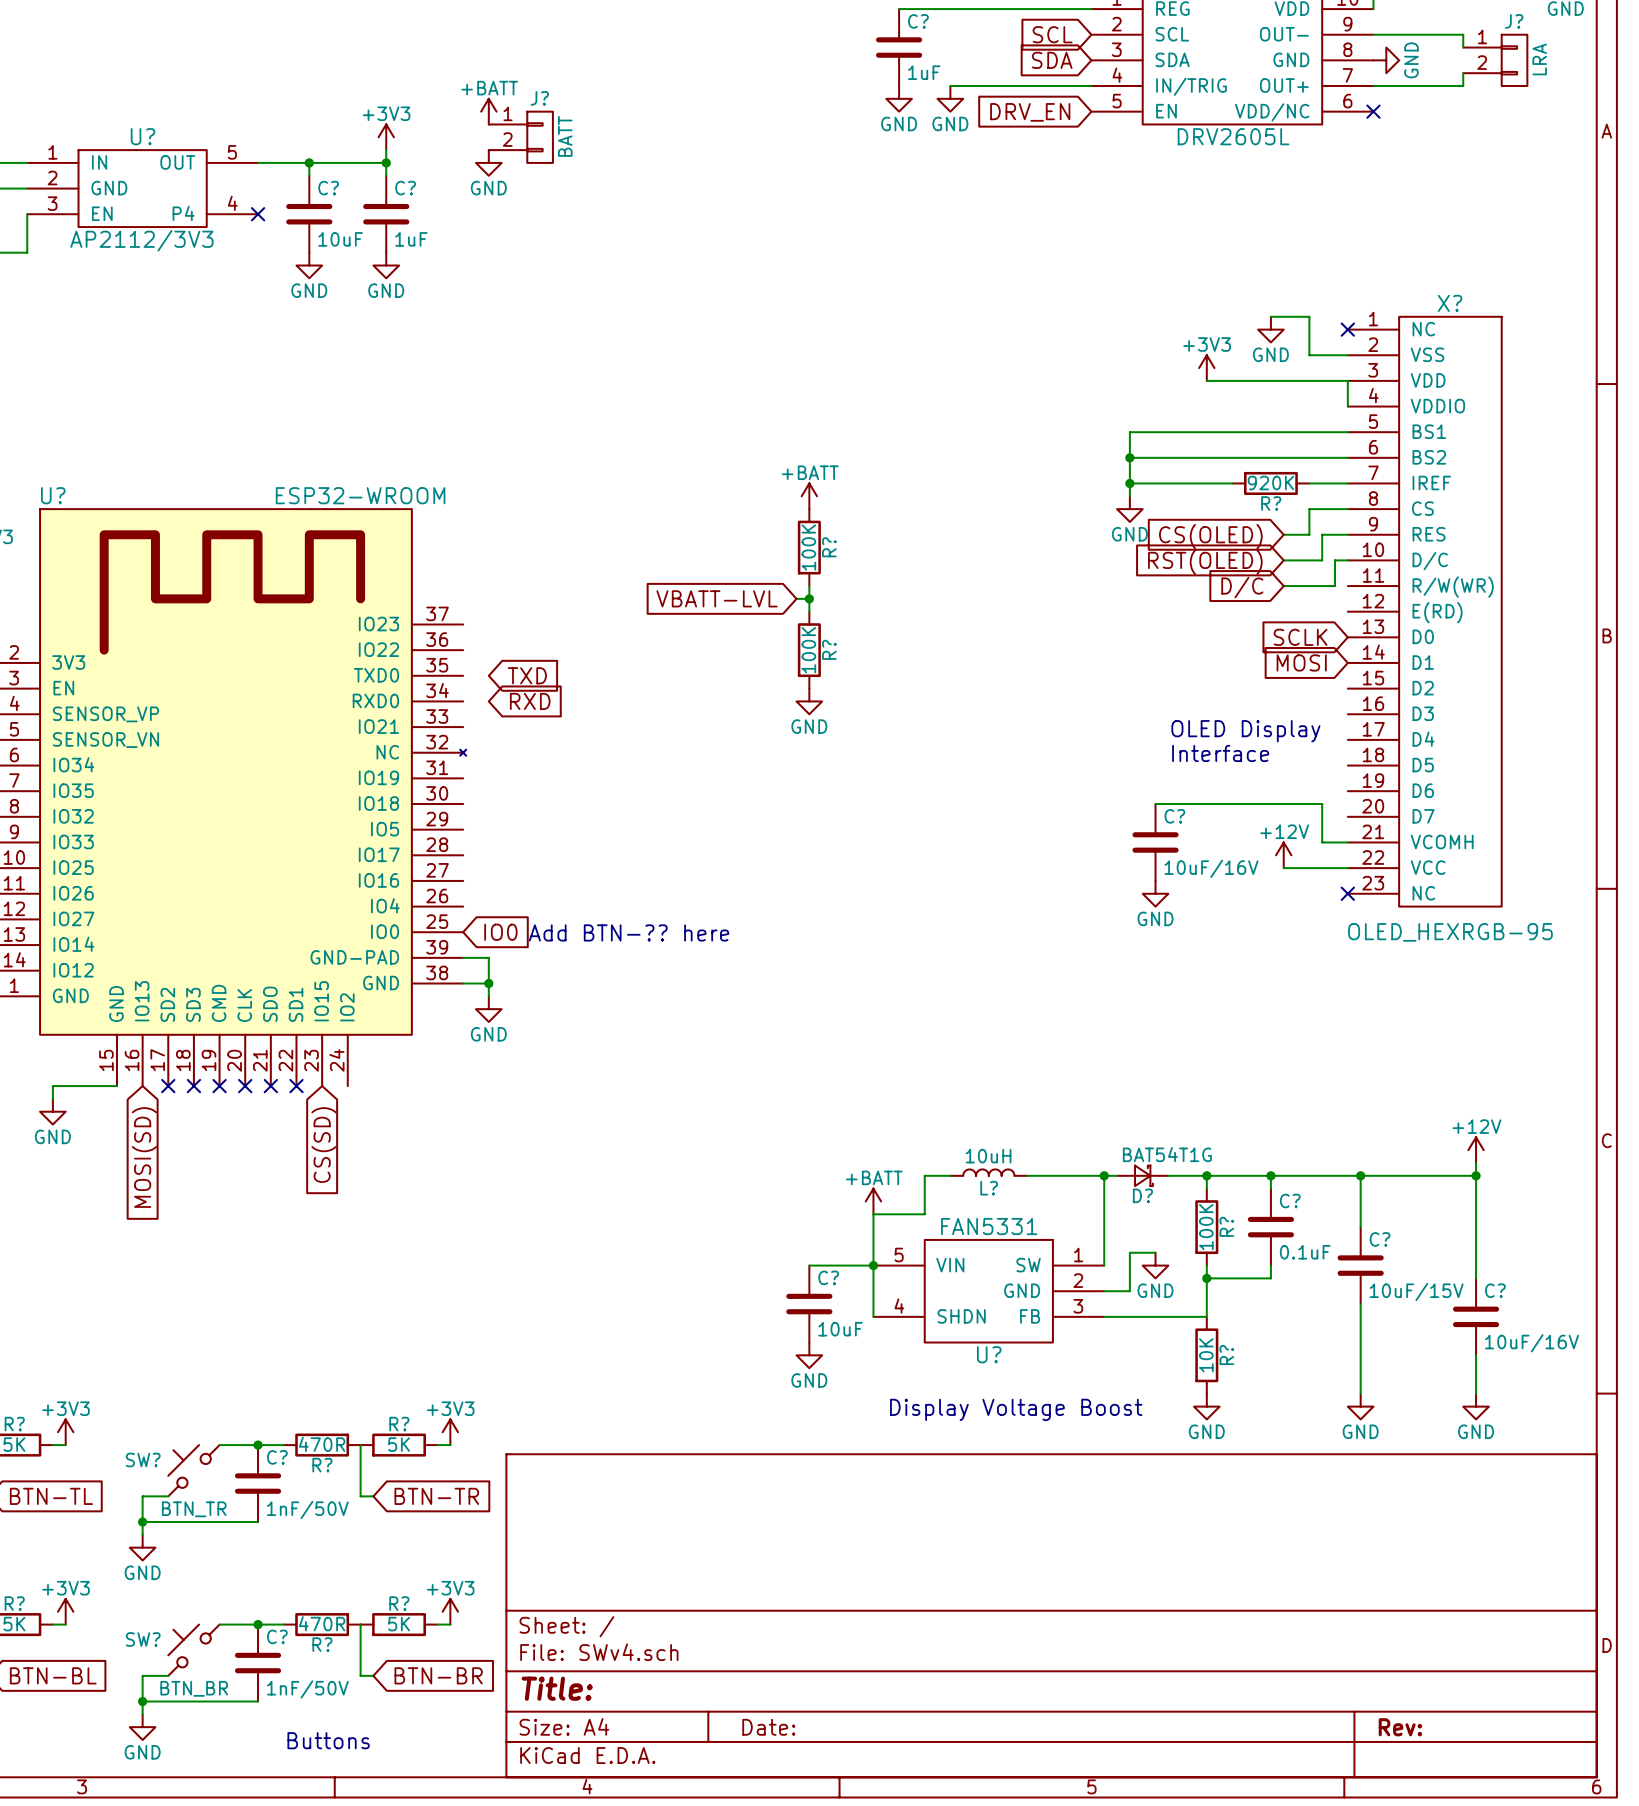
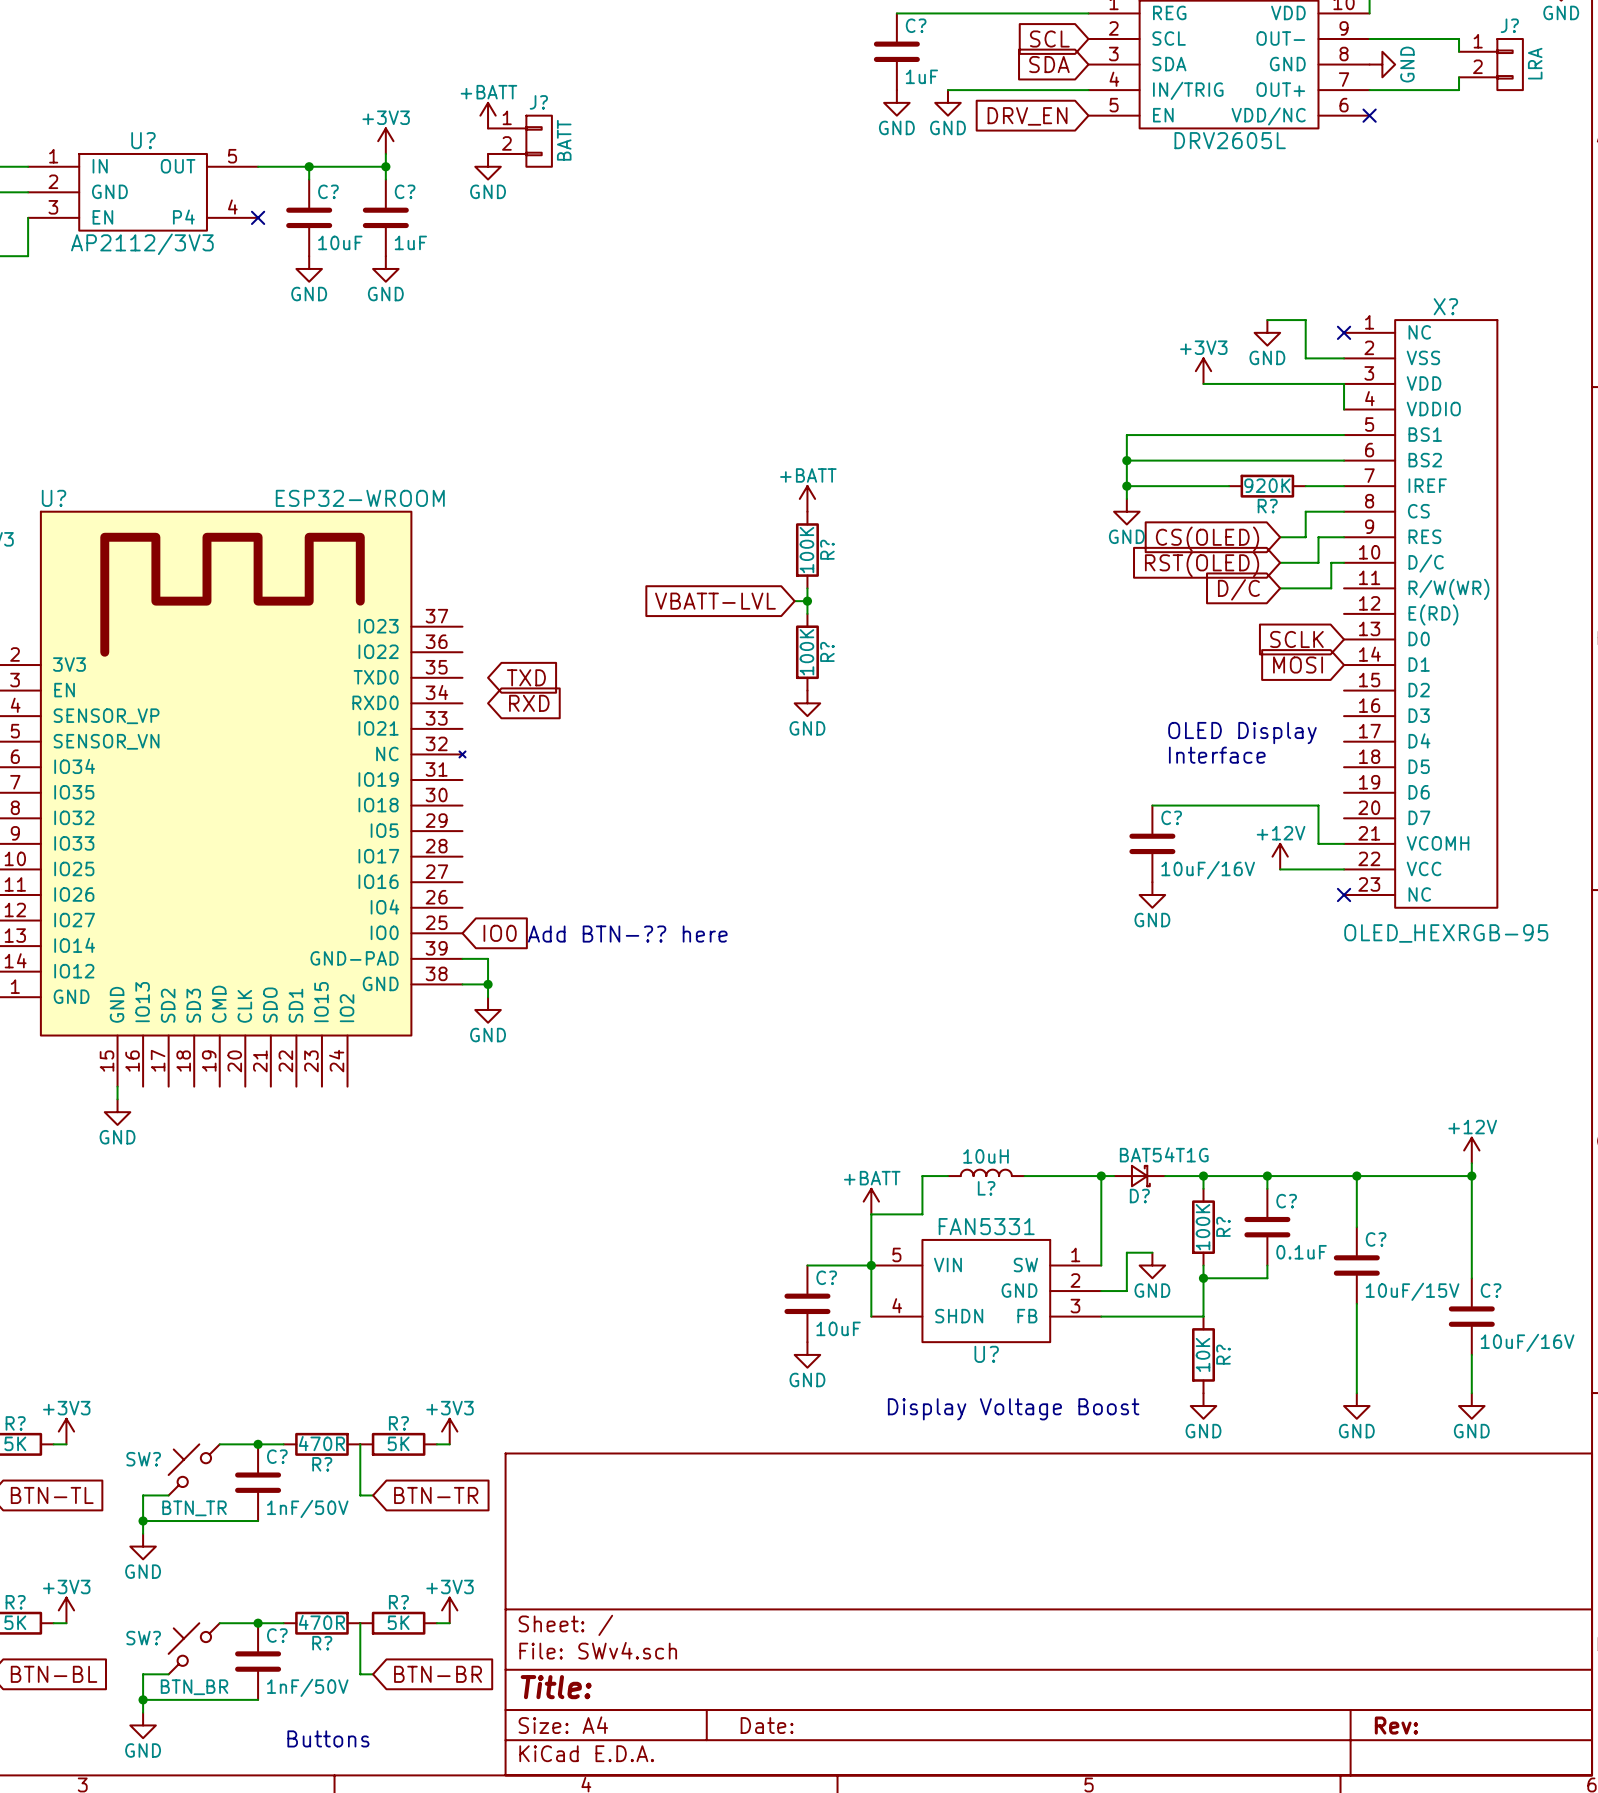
wire: (116, 1086) (52, 1086) (52, 1098) -> (117, 1086) (117, 1099)
no-connect mark: (168, 1086) -> none
no-connect mark: (193, 1086) -> none
no-connect mark: (219, 1086) -> none
no-connect mark: (245, 1086) -> none
no-connect mark: (270, 1086) -> none
no-connect mark: (296, 1086) -> none
power symbol position: GND (52, 1111) -> GND (117, 1112)
global label: CS(SD) (323, 1145) -> none
global label: MOSI(SD) (144, 1157) -> none

